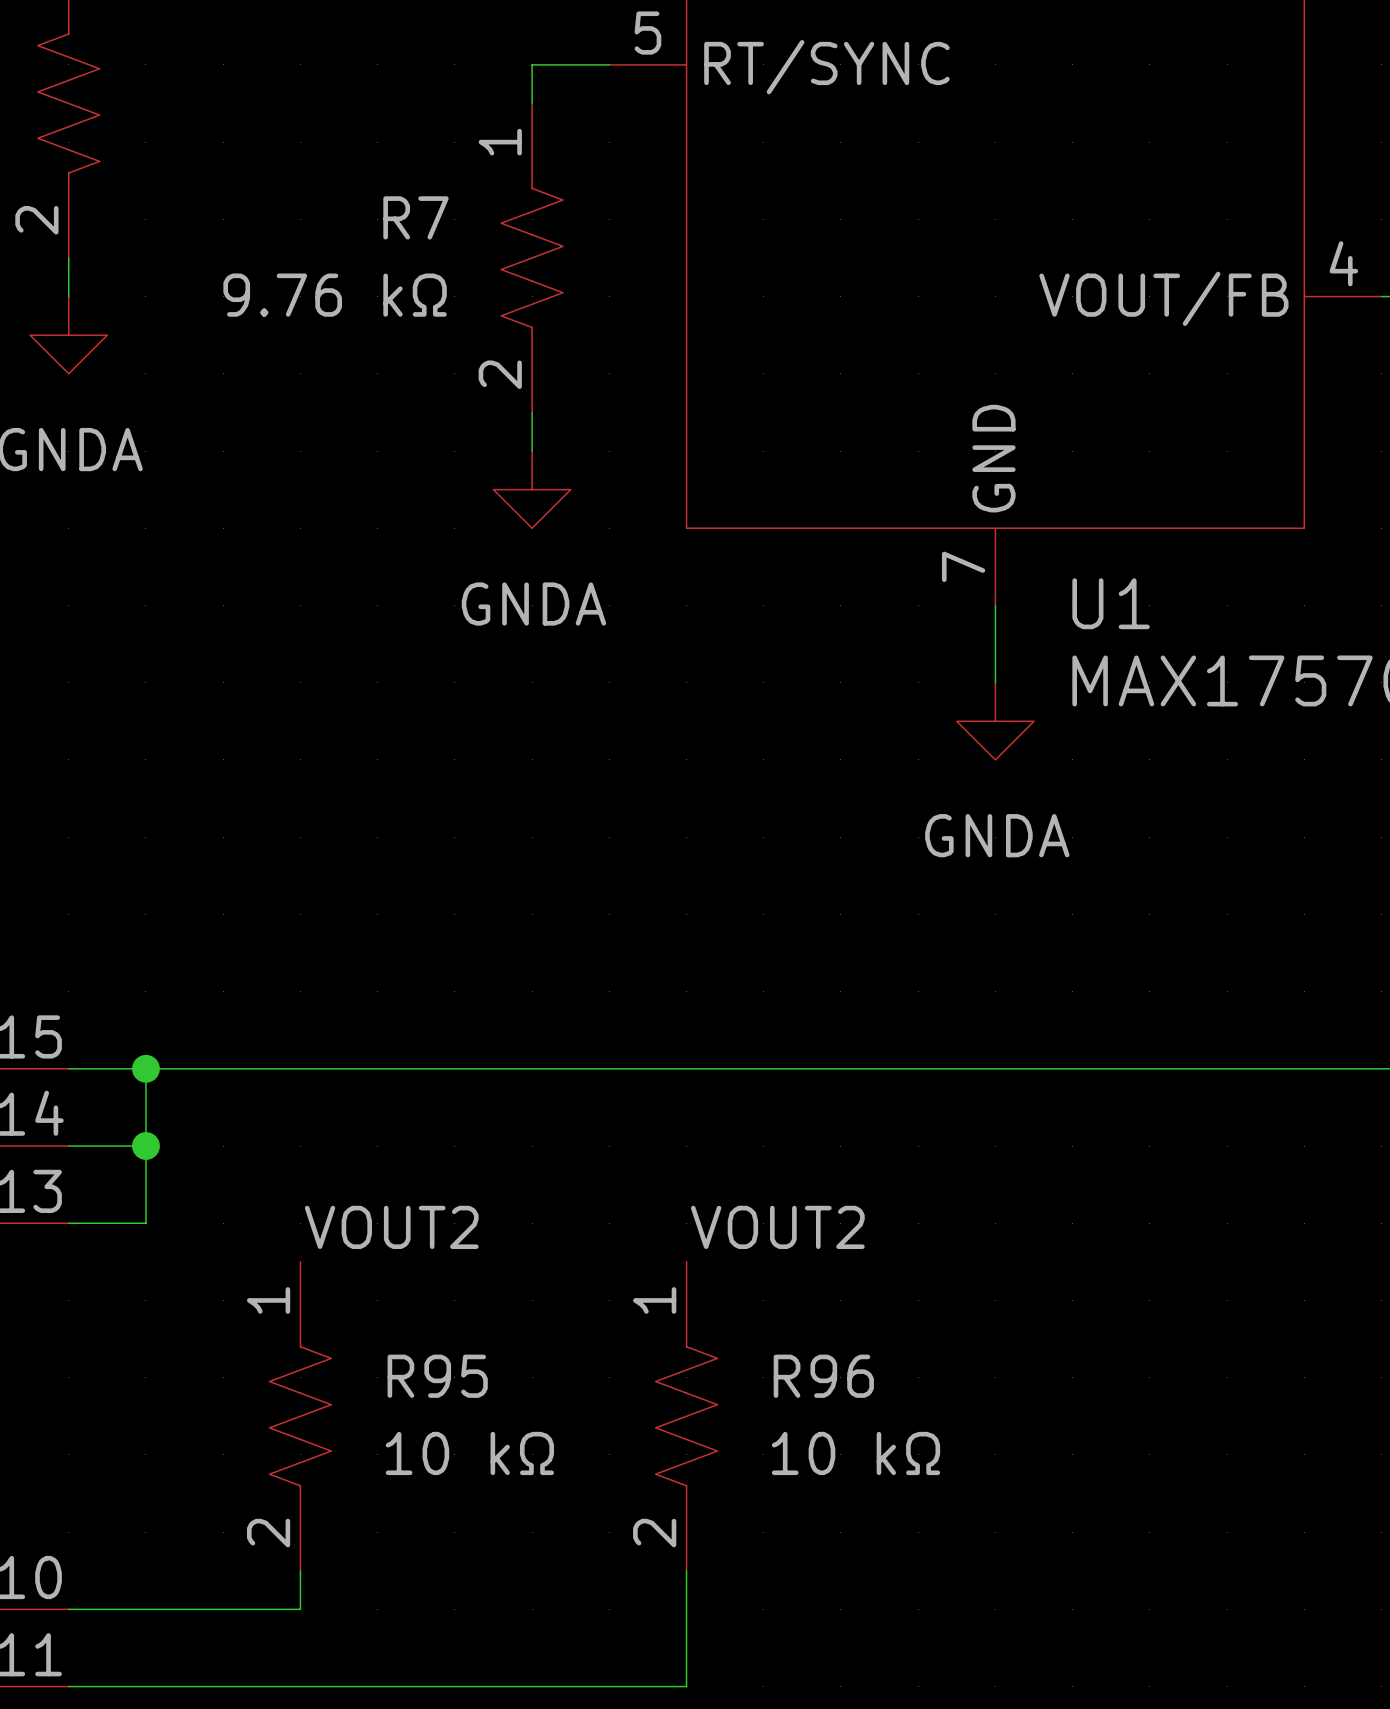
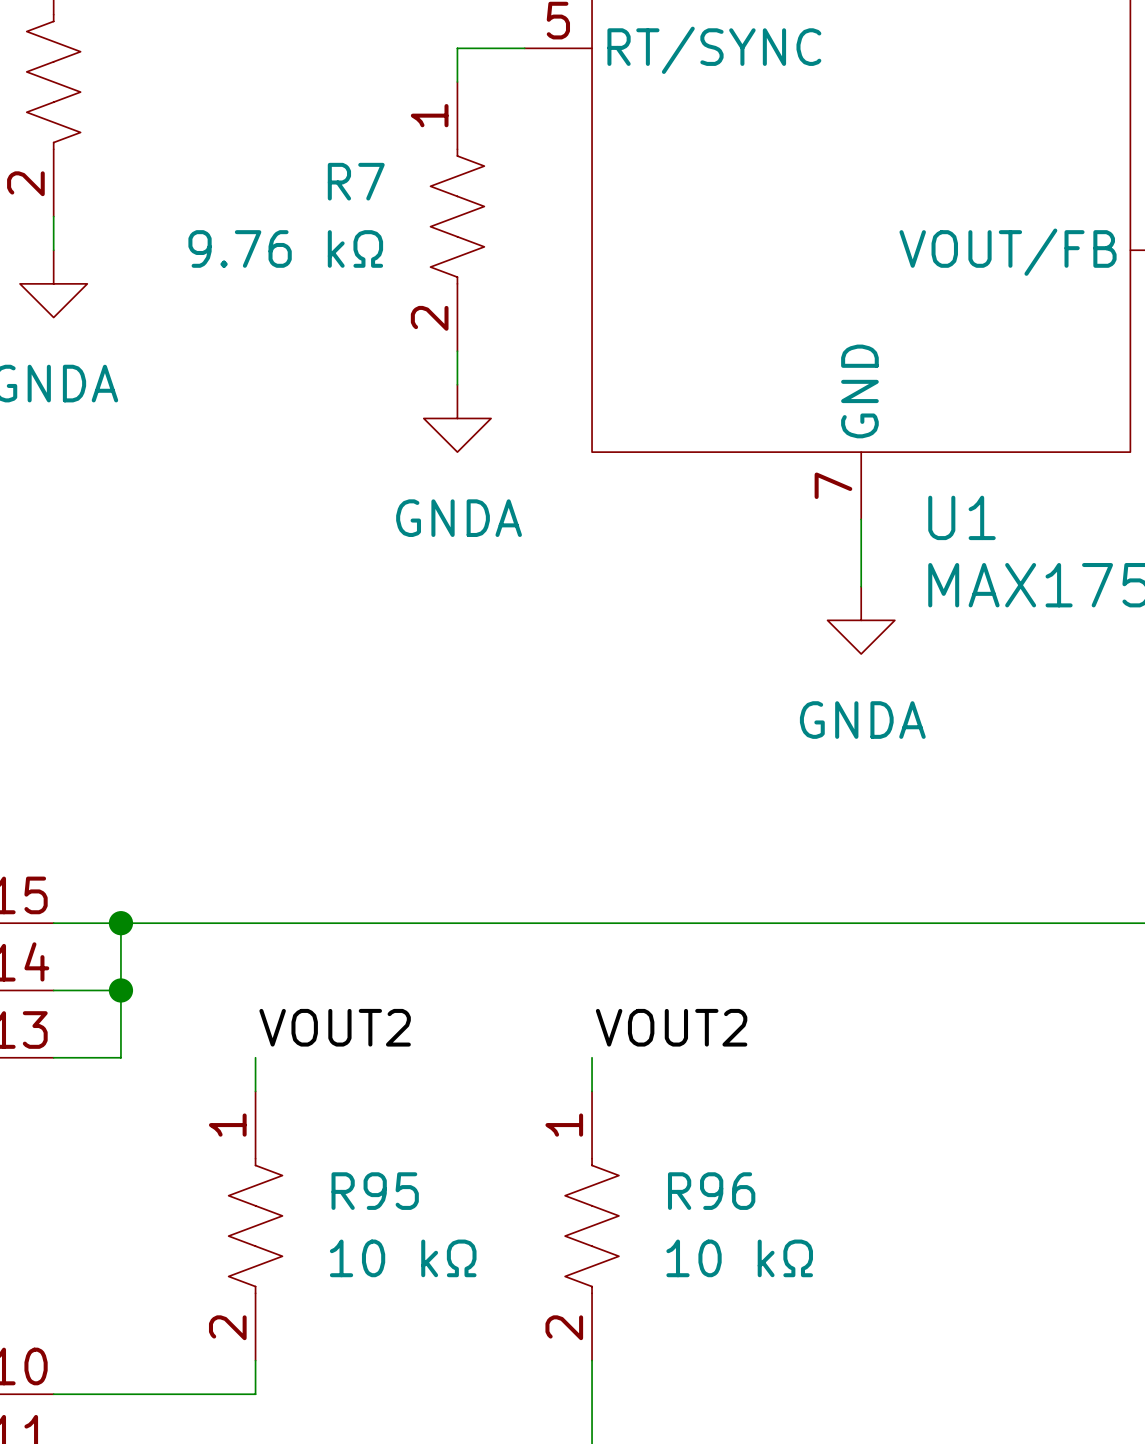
wire: none -> (255, 1057) (255, 1091)
wire: none -> (592, 1057) (592, 1091)
label position: VOUT2 (391, 1227) -> VOUT2 (335, 1027)
label position: VOUT2 (777, 1227) -> VOUT2 (671, 1027)

